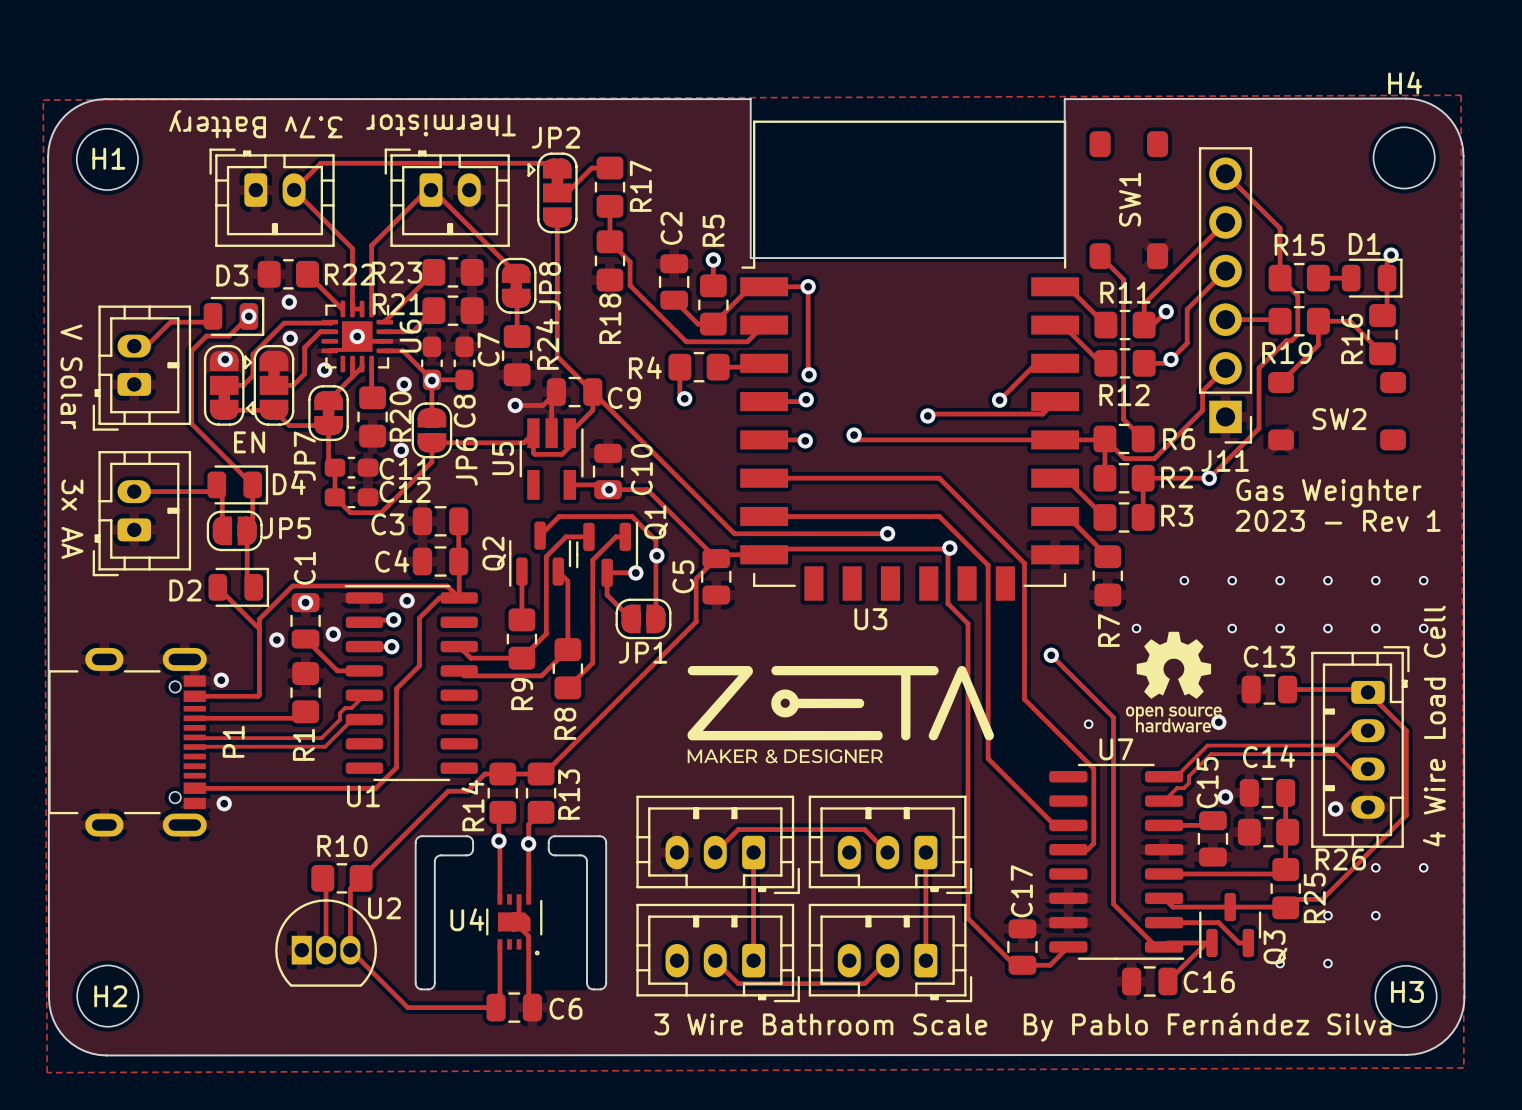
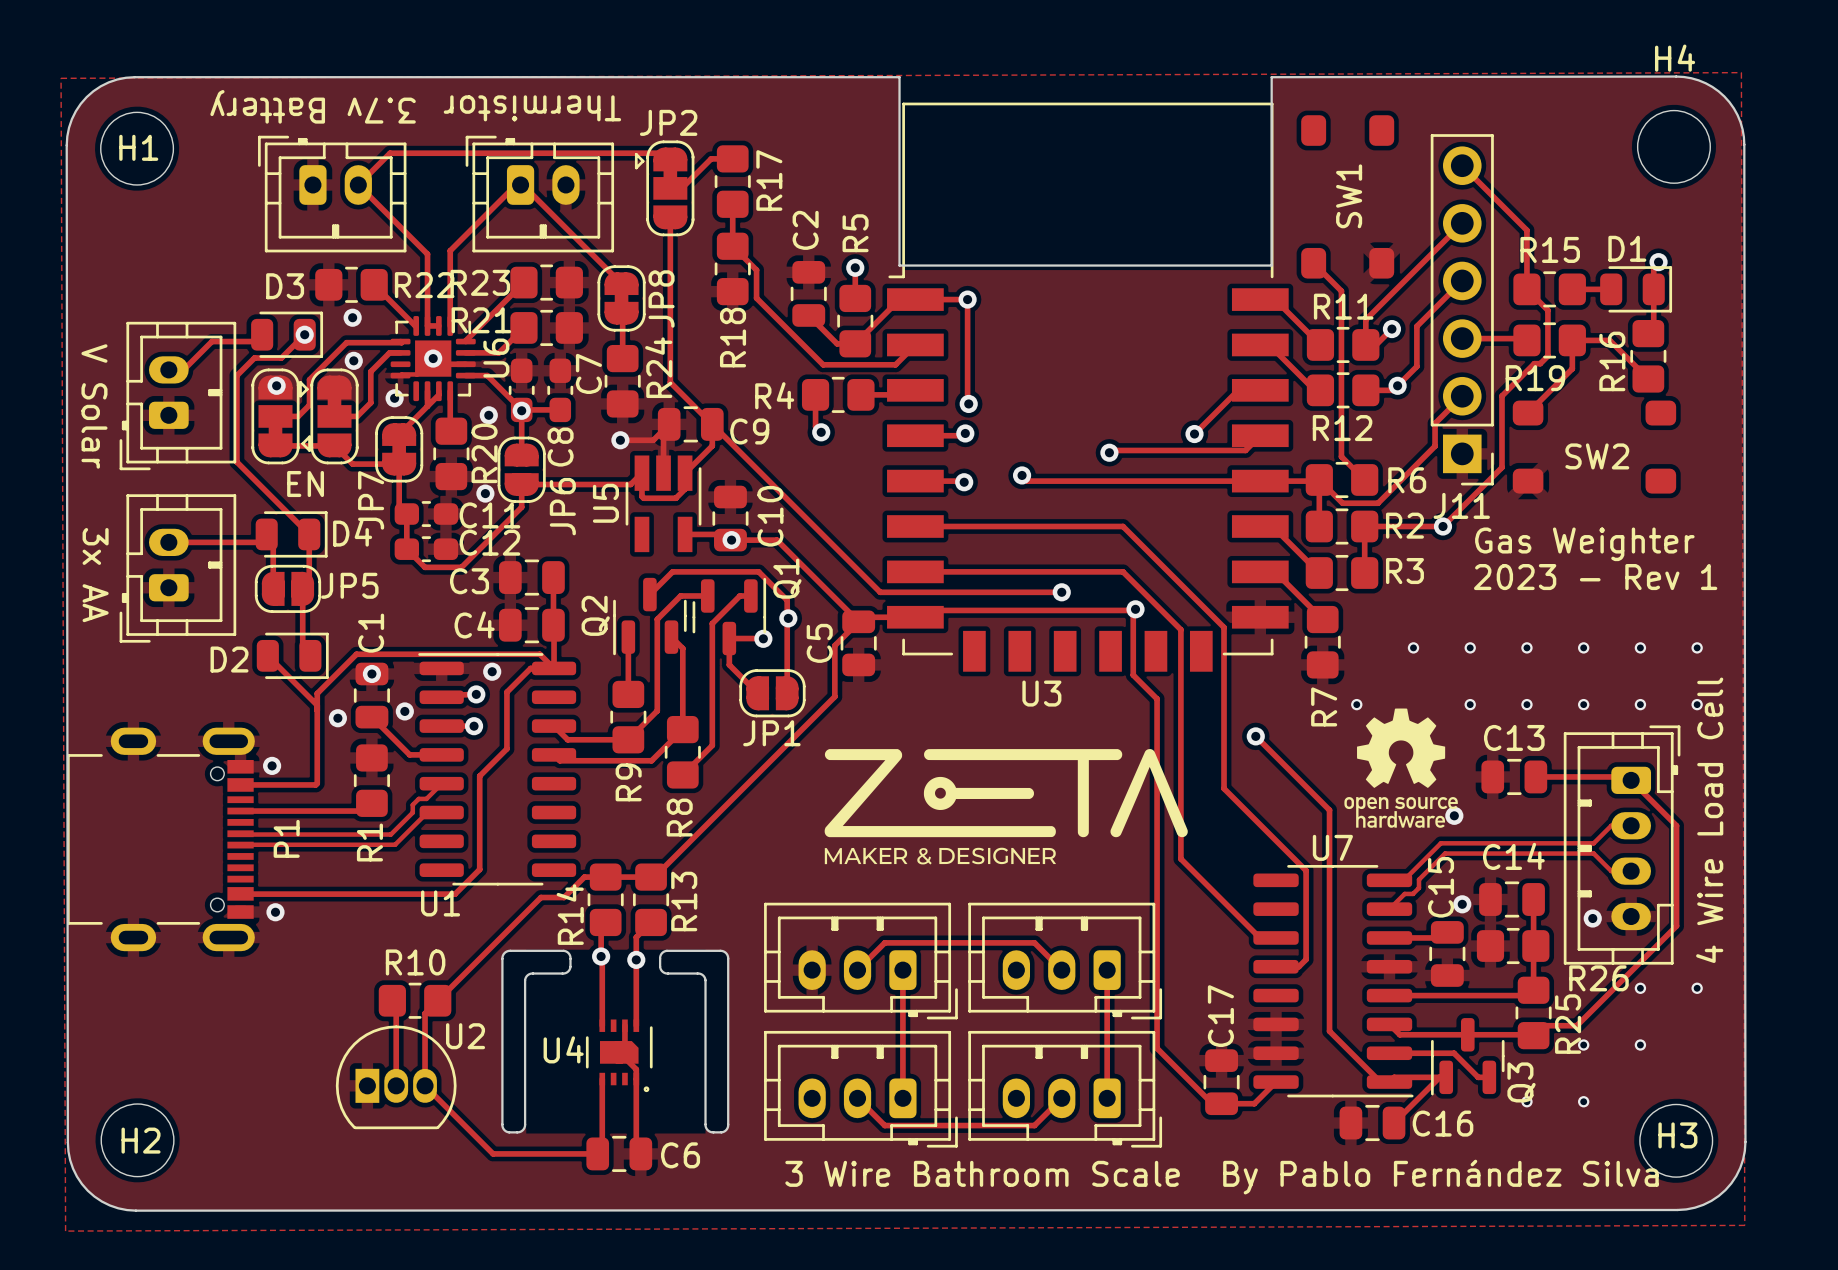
via: (1088, 724) -> none

